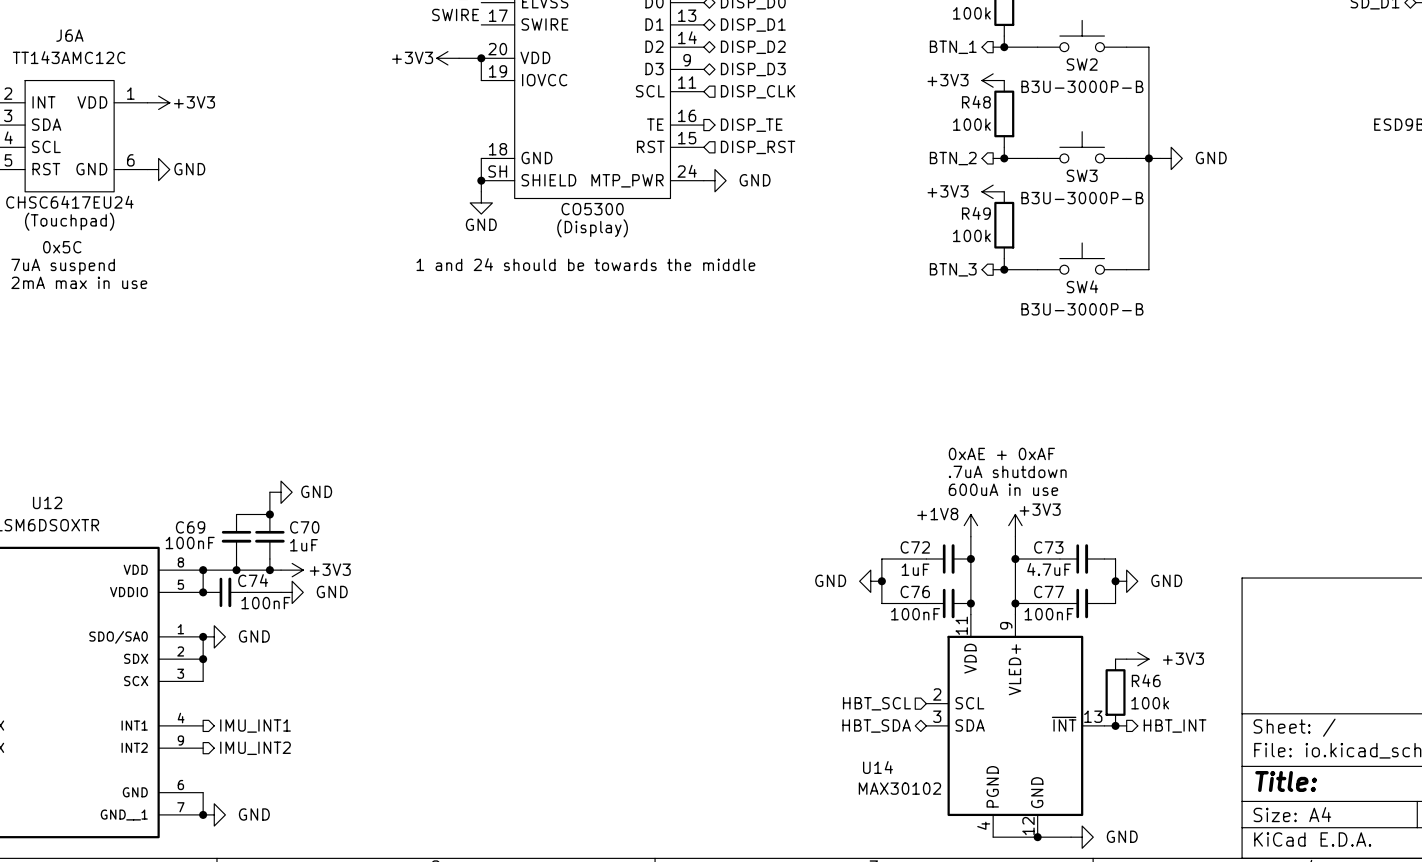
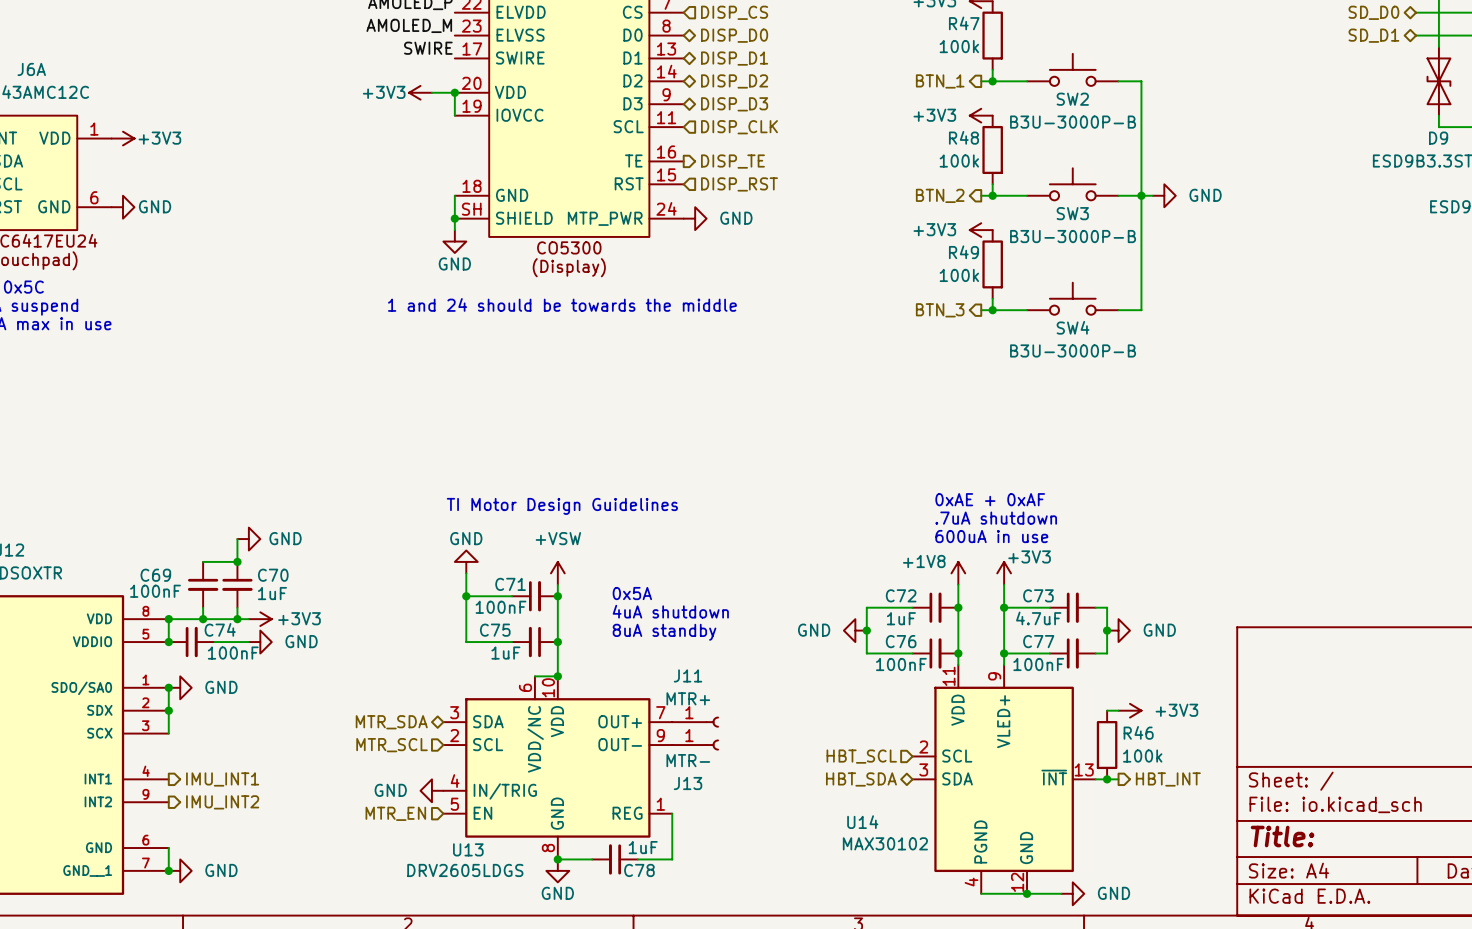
text: none -> TI Motor Design Guidelines (562, 506)
power symbol: none -> GND (466, 561)
wire: none -> (466, 573) (466, 642) (512, 642)
power symbol: none -> +VSW (557, 573)
wire: none -> (557, 584) (557, 676) (534, 676)
text: none -> 0x5A (632, 593)
wire: none -> (466, 596) (512, 596)
junction: none -> (466, 596)
C71: none -> 100nF (534, 596)
junction: none -> (557, 596)
text: none -> 4uA shutdown (670, 611)
text: none -> 8uA standby (664, 632)
C75: none -> 1uF (534, 642)
junction: none -> (557, 642)
junction: none -> (557, 676)
hierarchical label: none -> MTR_SDA (391, 722)
J11: none -> MTR+ (695, 722)
hierarchical label: none -> MTR_SCL (392, 745)
J13: none -> MTR- (695, 745)
U13: none -> DRV2605LDGS (557, 767)
power symbol: none -> GND (431, 790)
hierarchical label: none -> MTR_EN (395, 813)
wire: none -> (672, 813) (672, 859) (637, 859)
wire: none -> (557, 859) (592, 859)
junction: none -> (557, 859)
C78: none -> 1uF (615, 859)
power symbol: none -> GND (557, 870)

